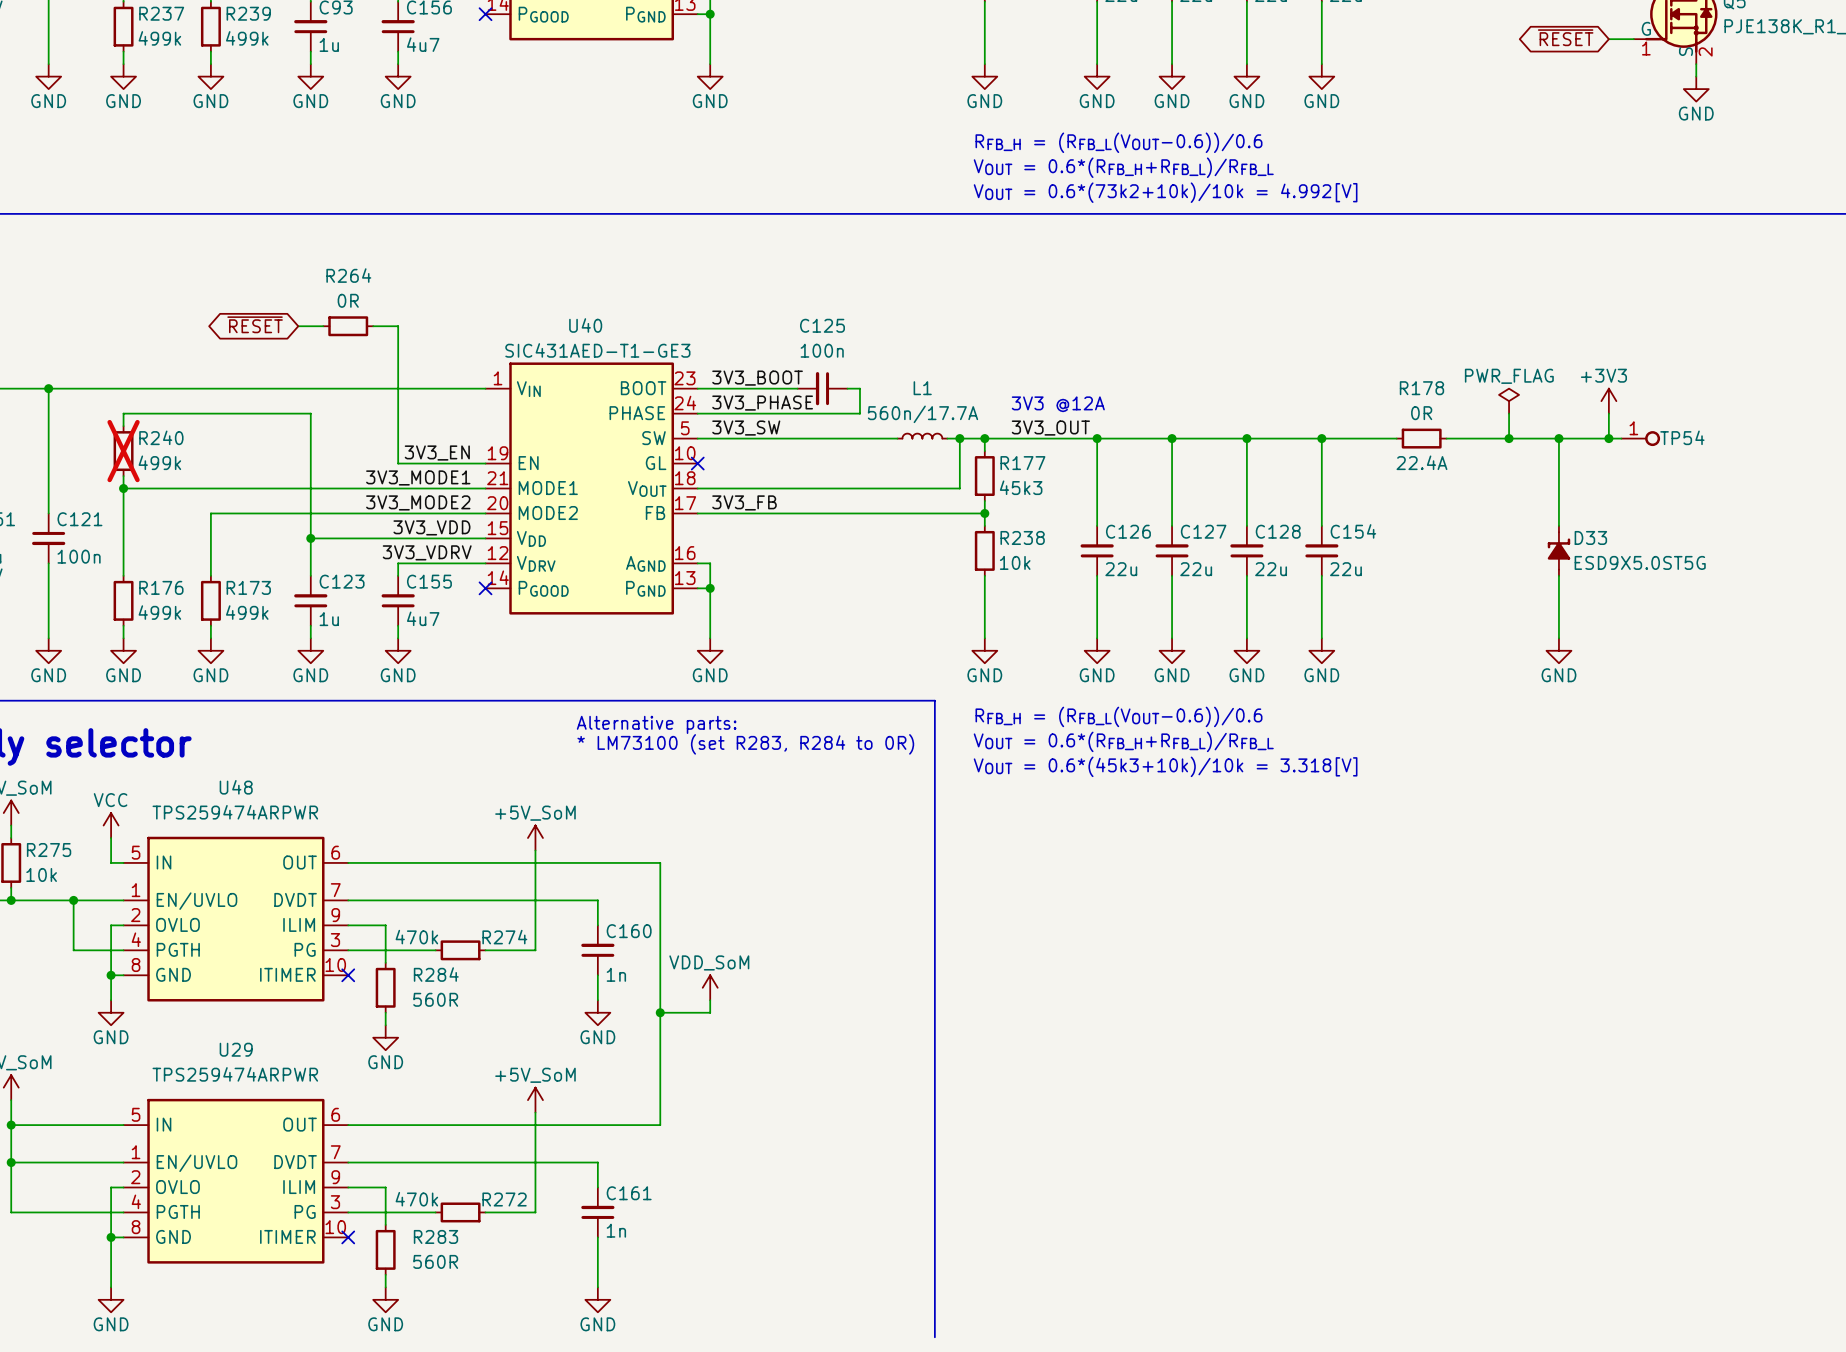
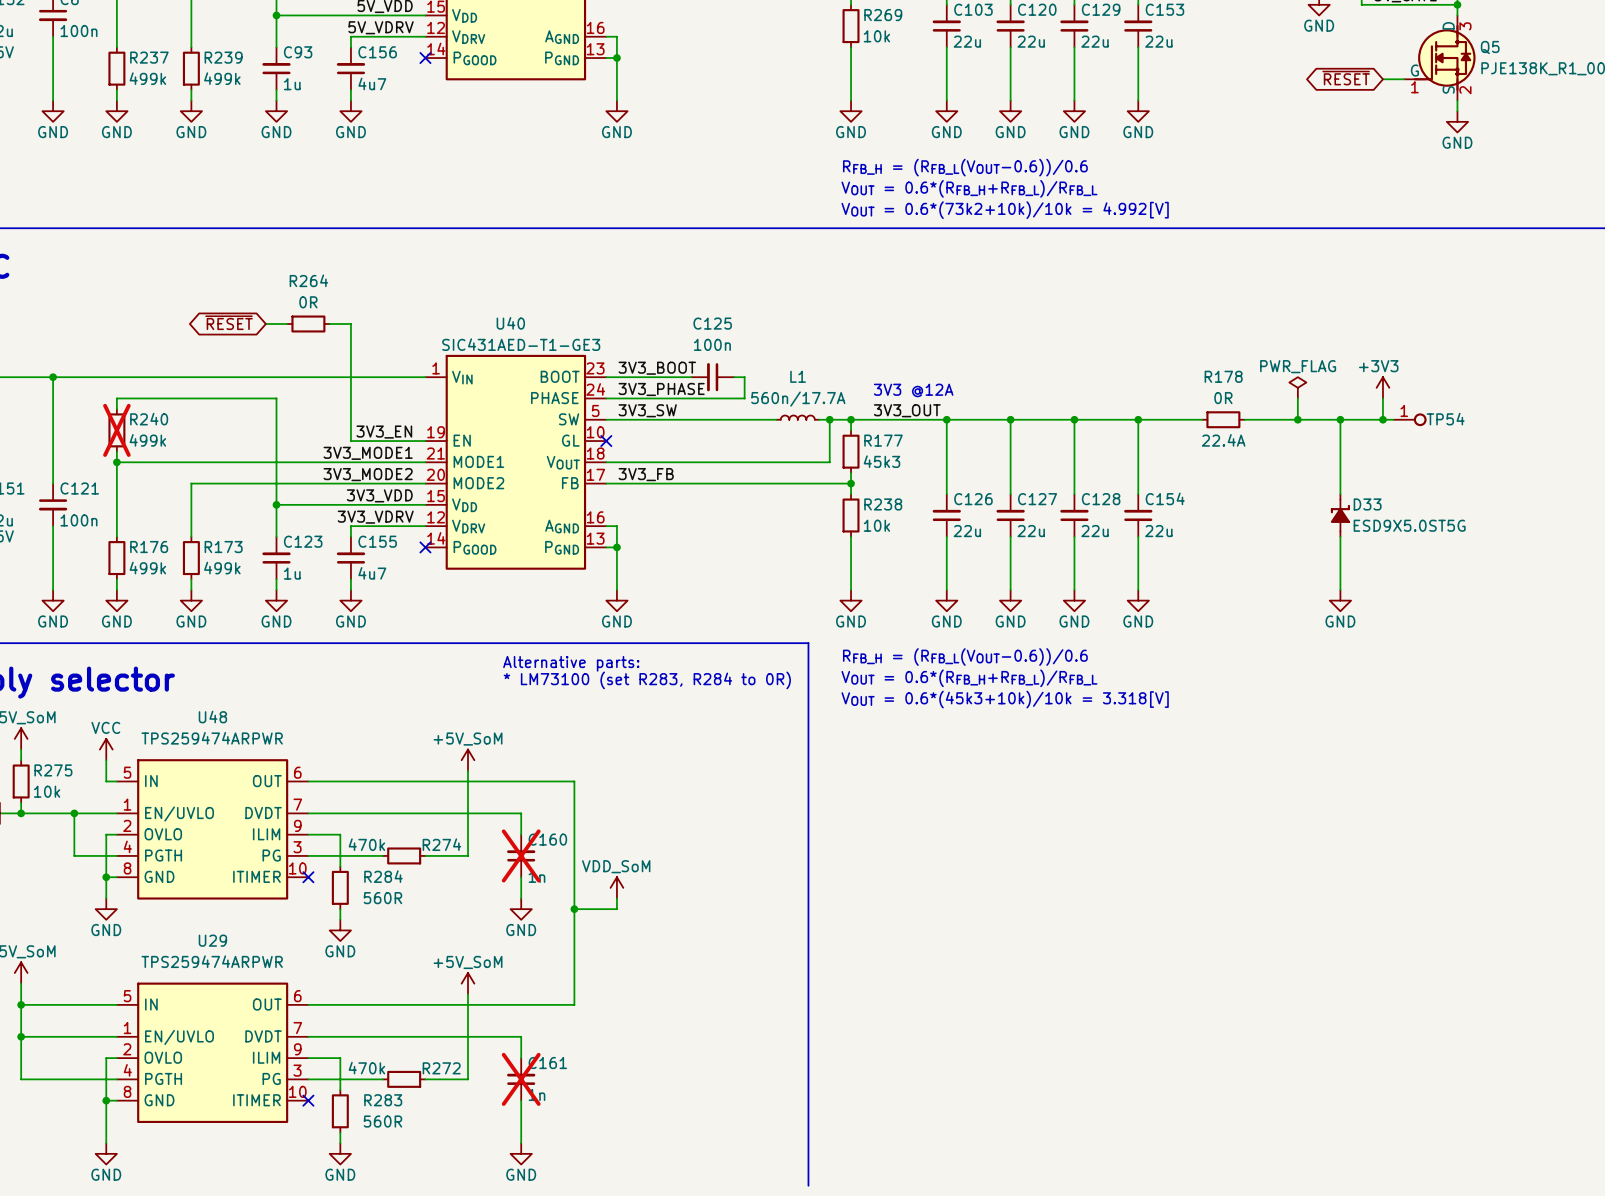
C160 do-not-place cross: none -> (521, 855)
C161 do-not-place cross: none -> (521, 1079)

